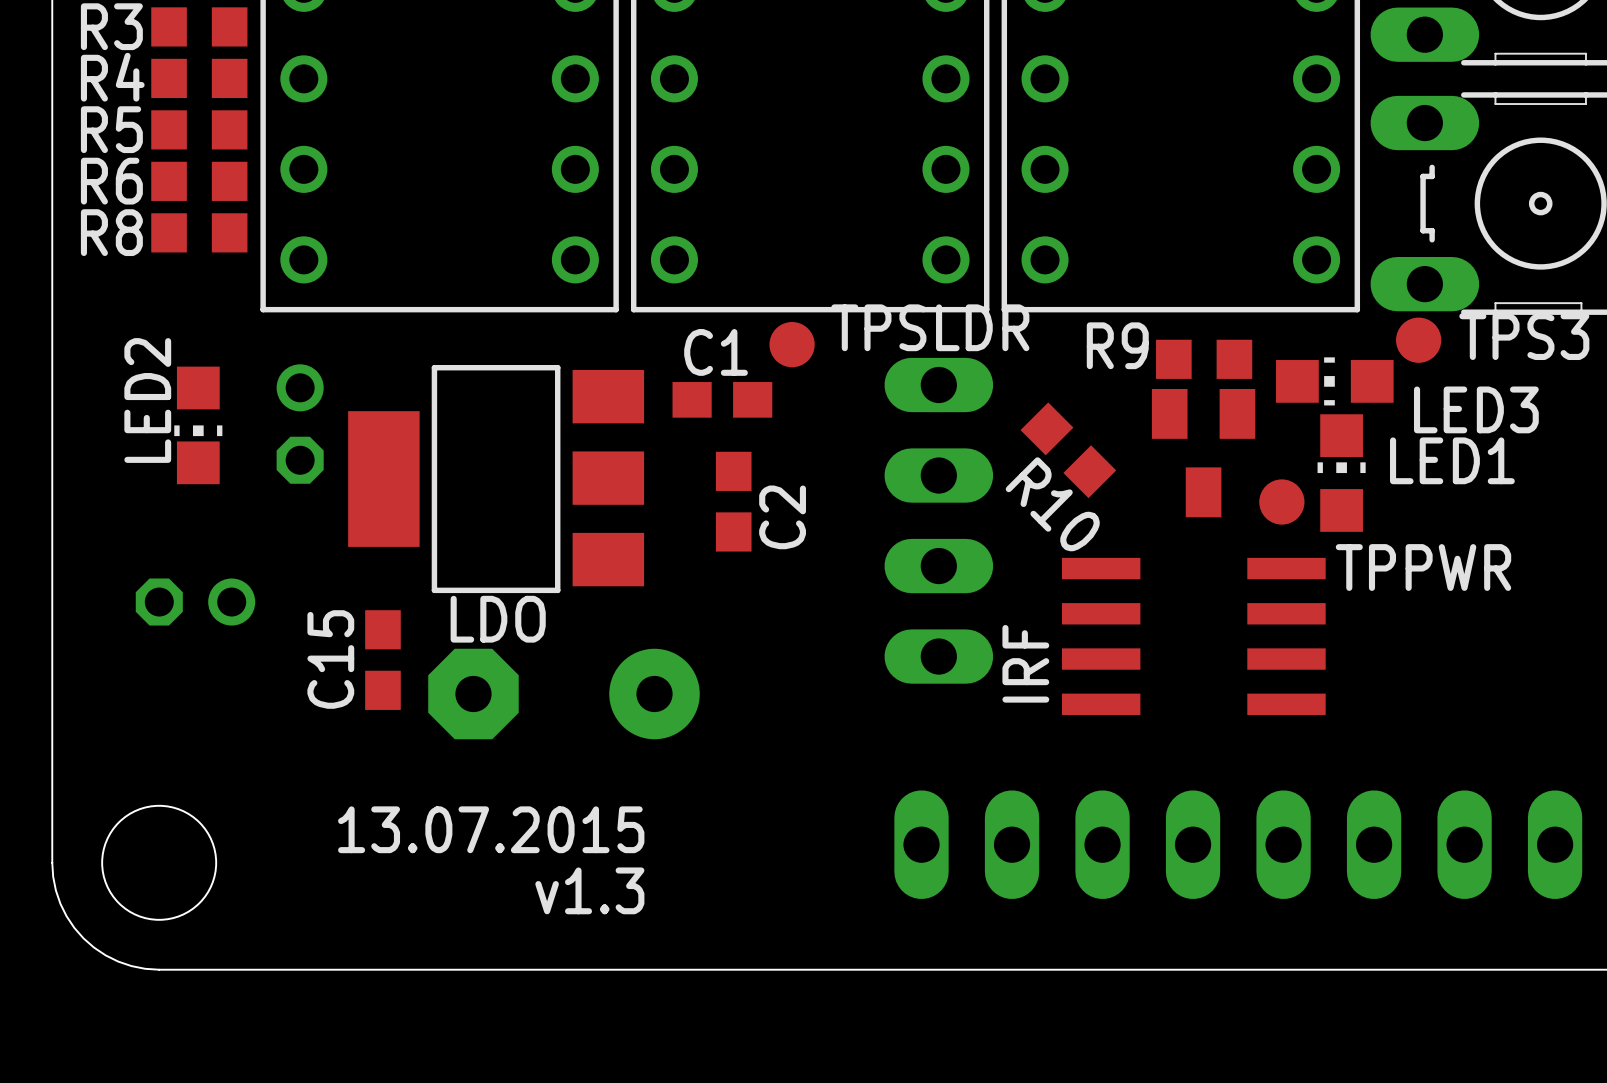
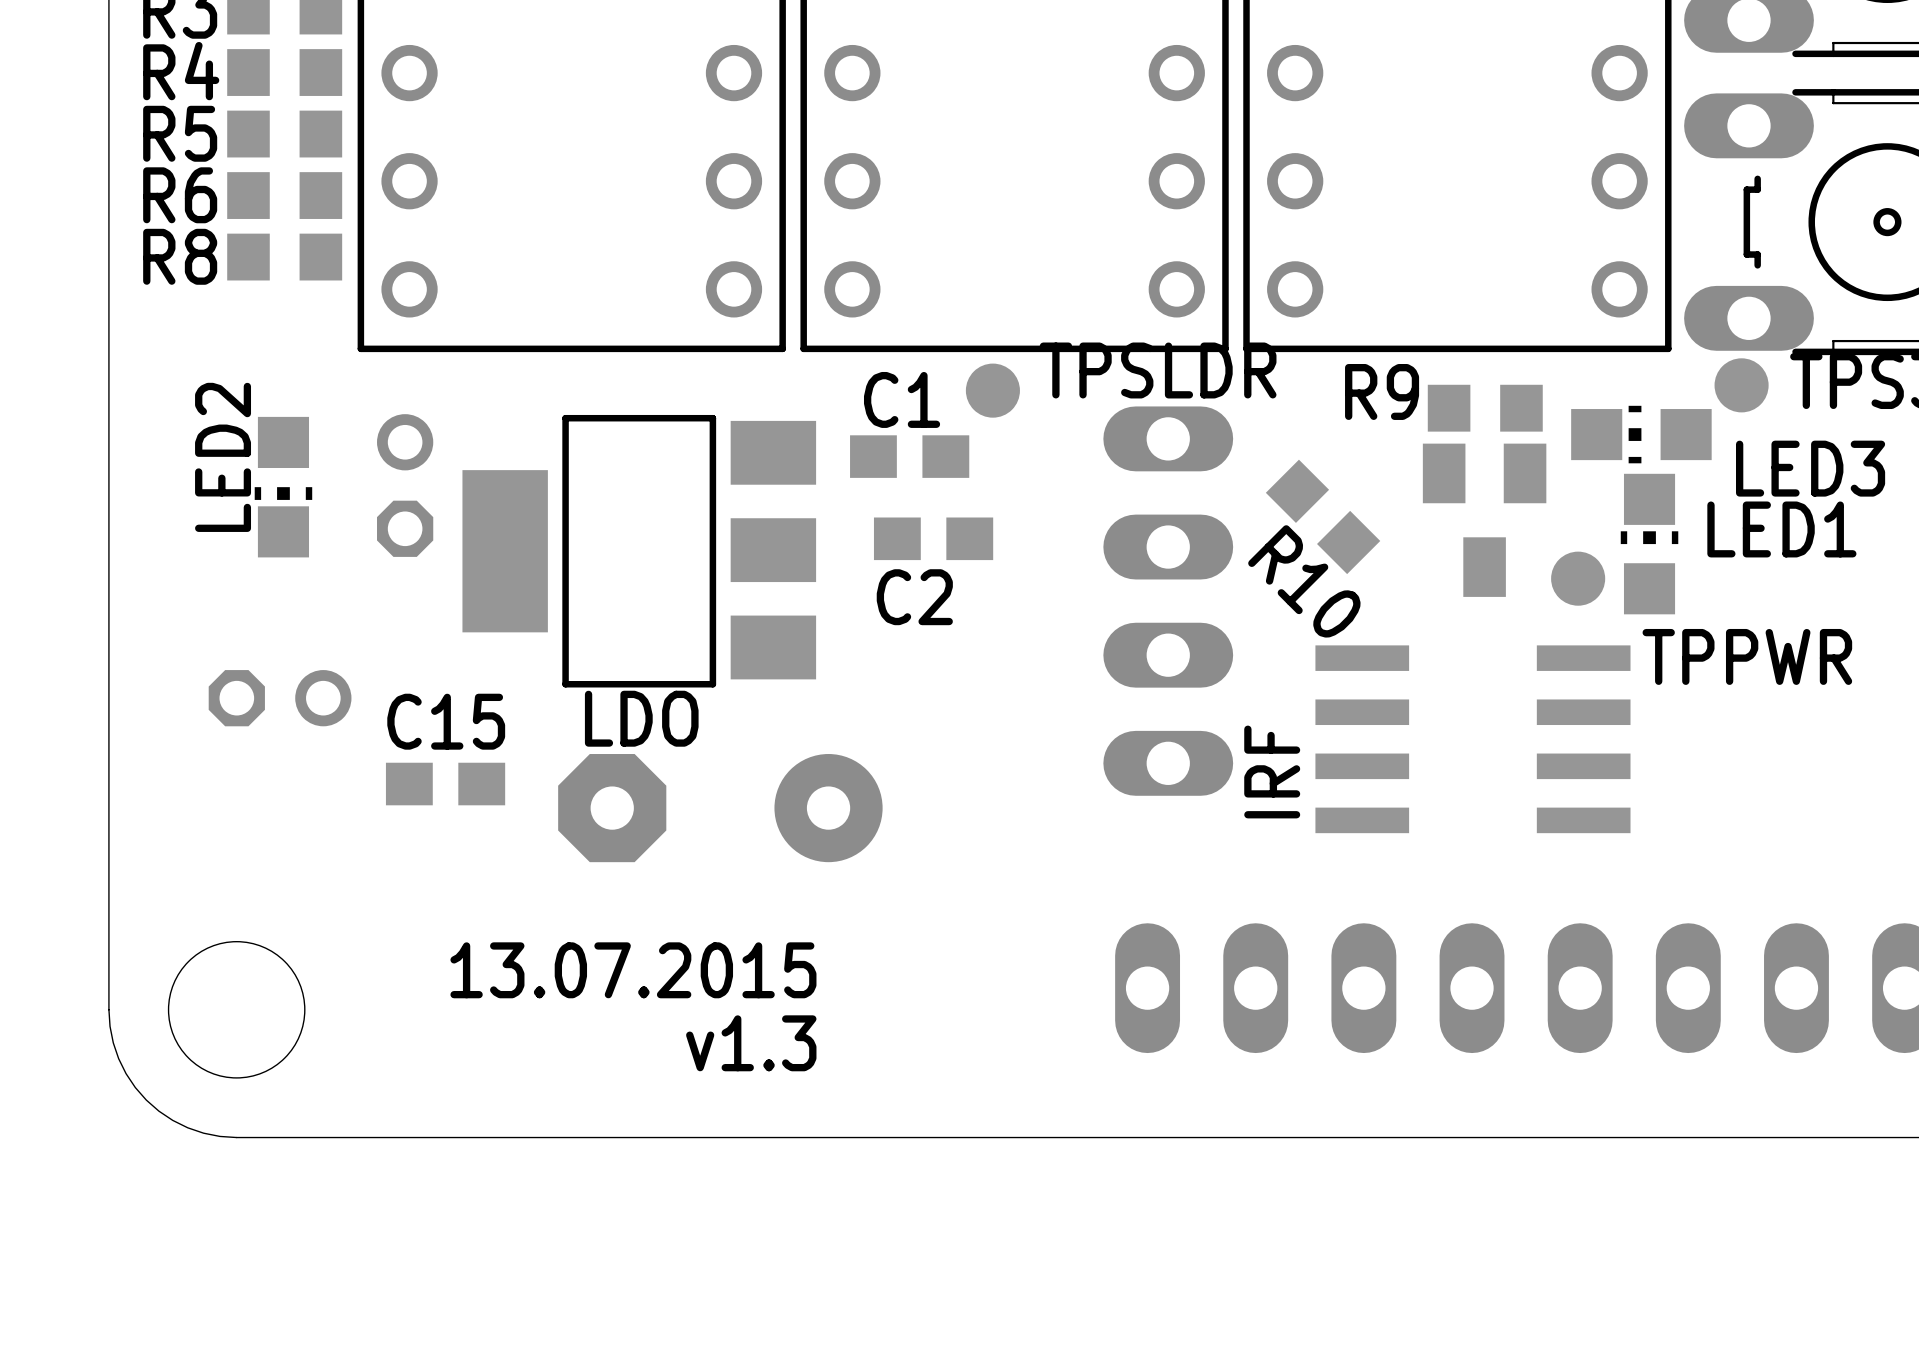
C2 rotation: 0° (733, 501) -> 90° clockwise (933, 538)
C15 rotation: 0° (382, 660) -> 90° clockwise (445, 784)

